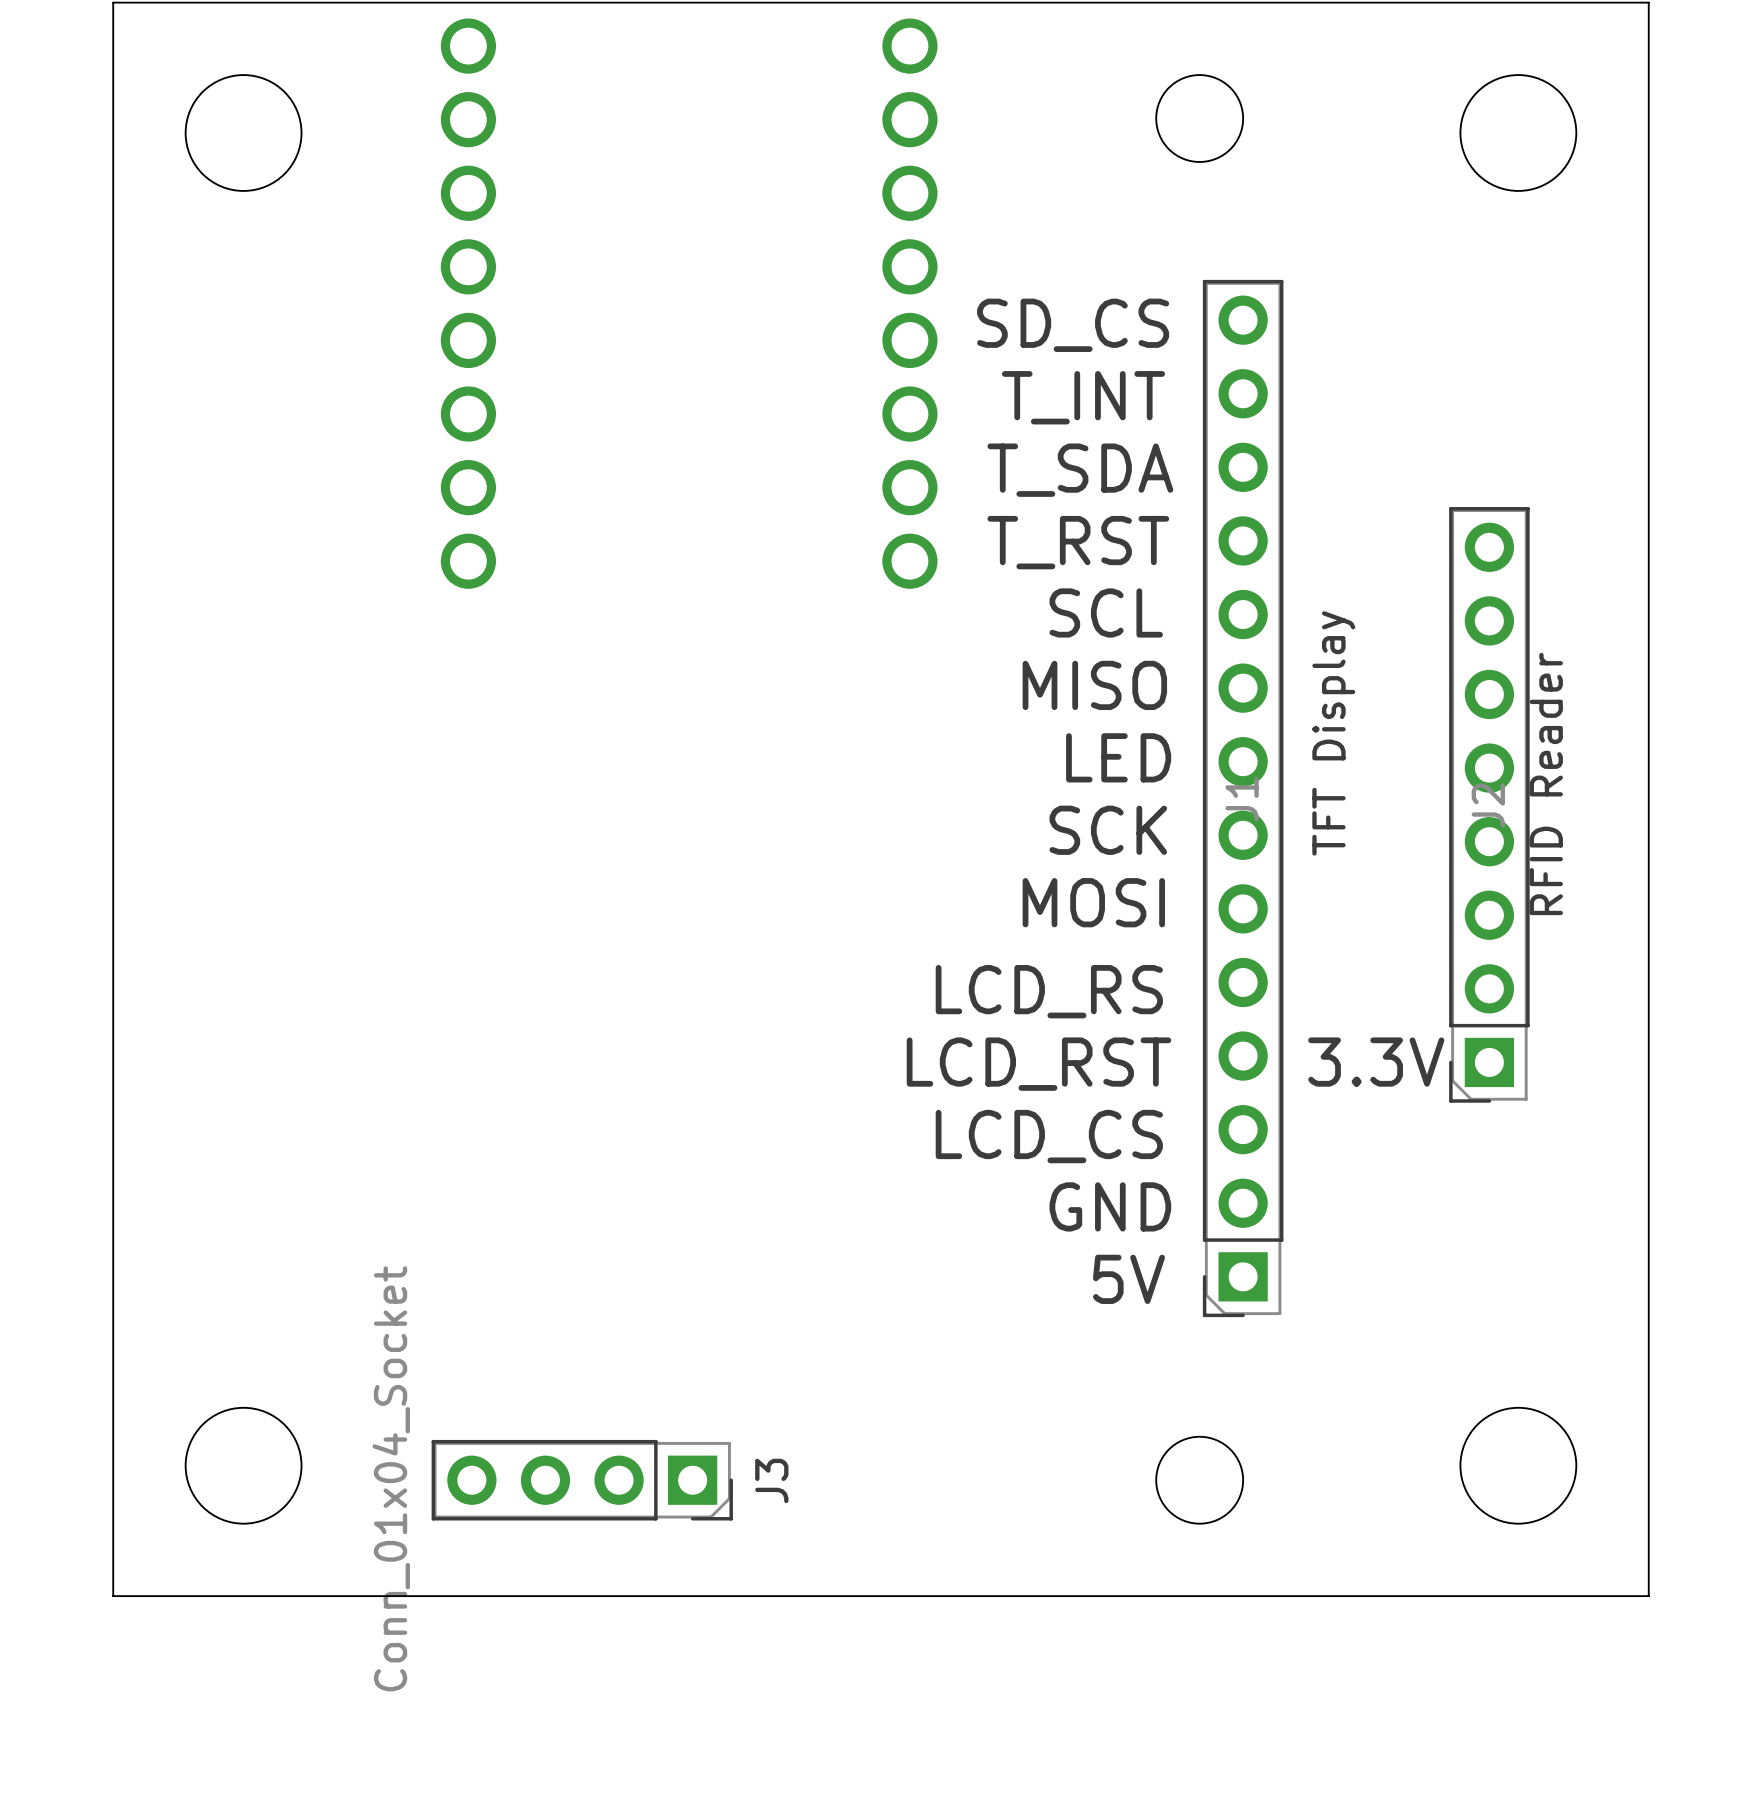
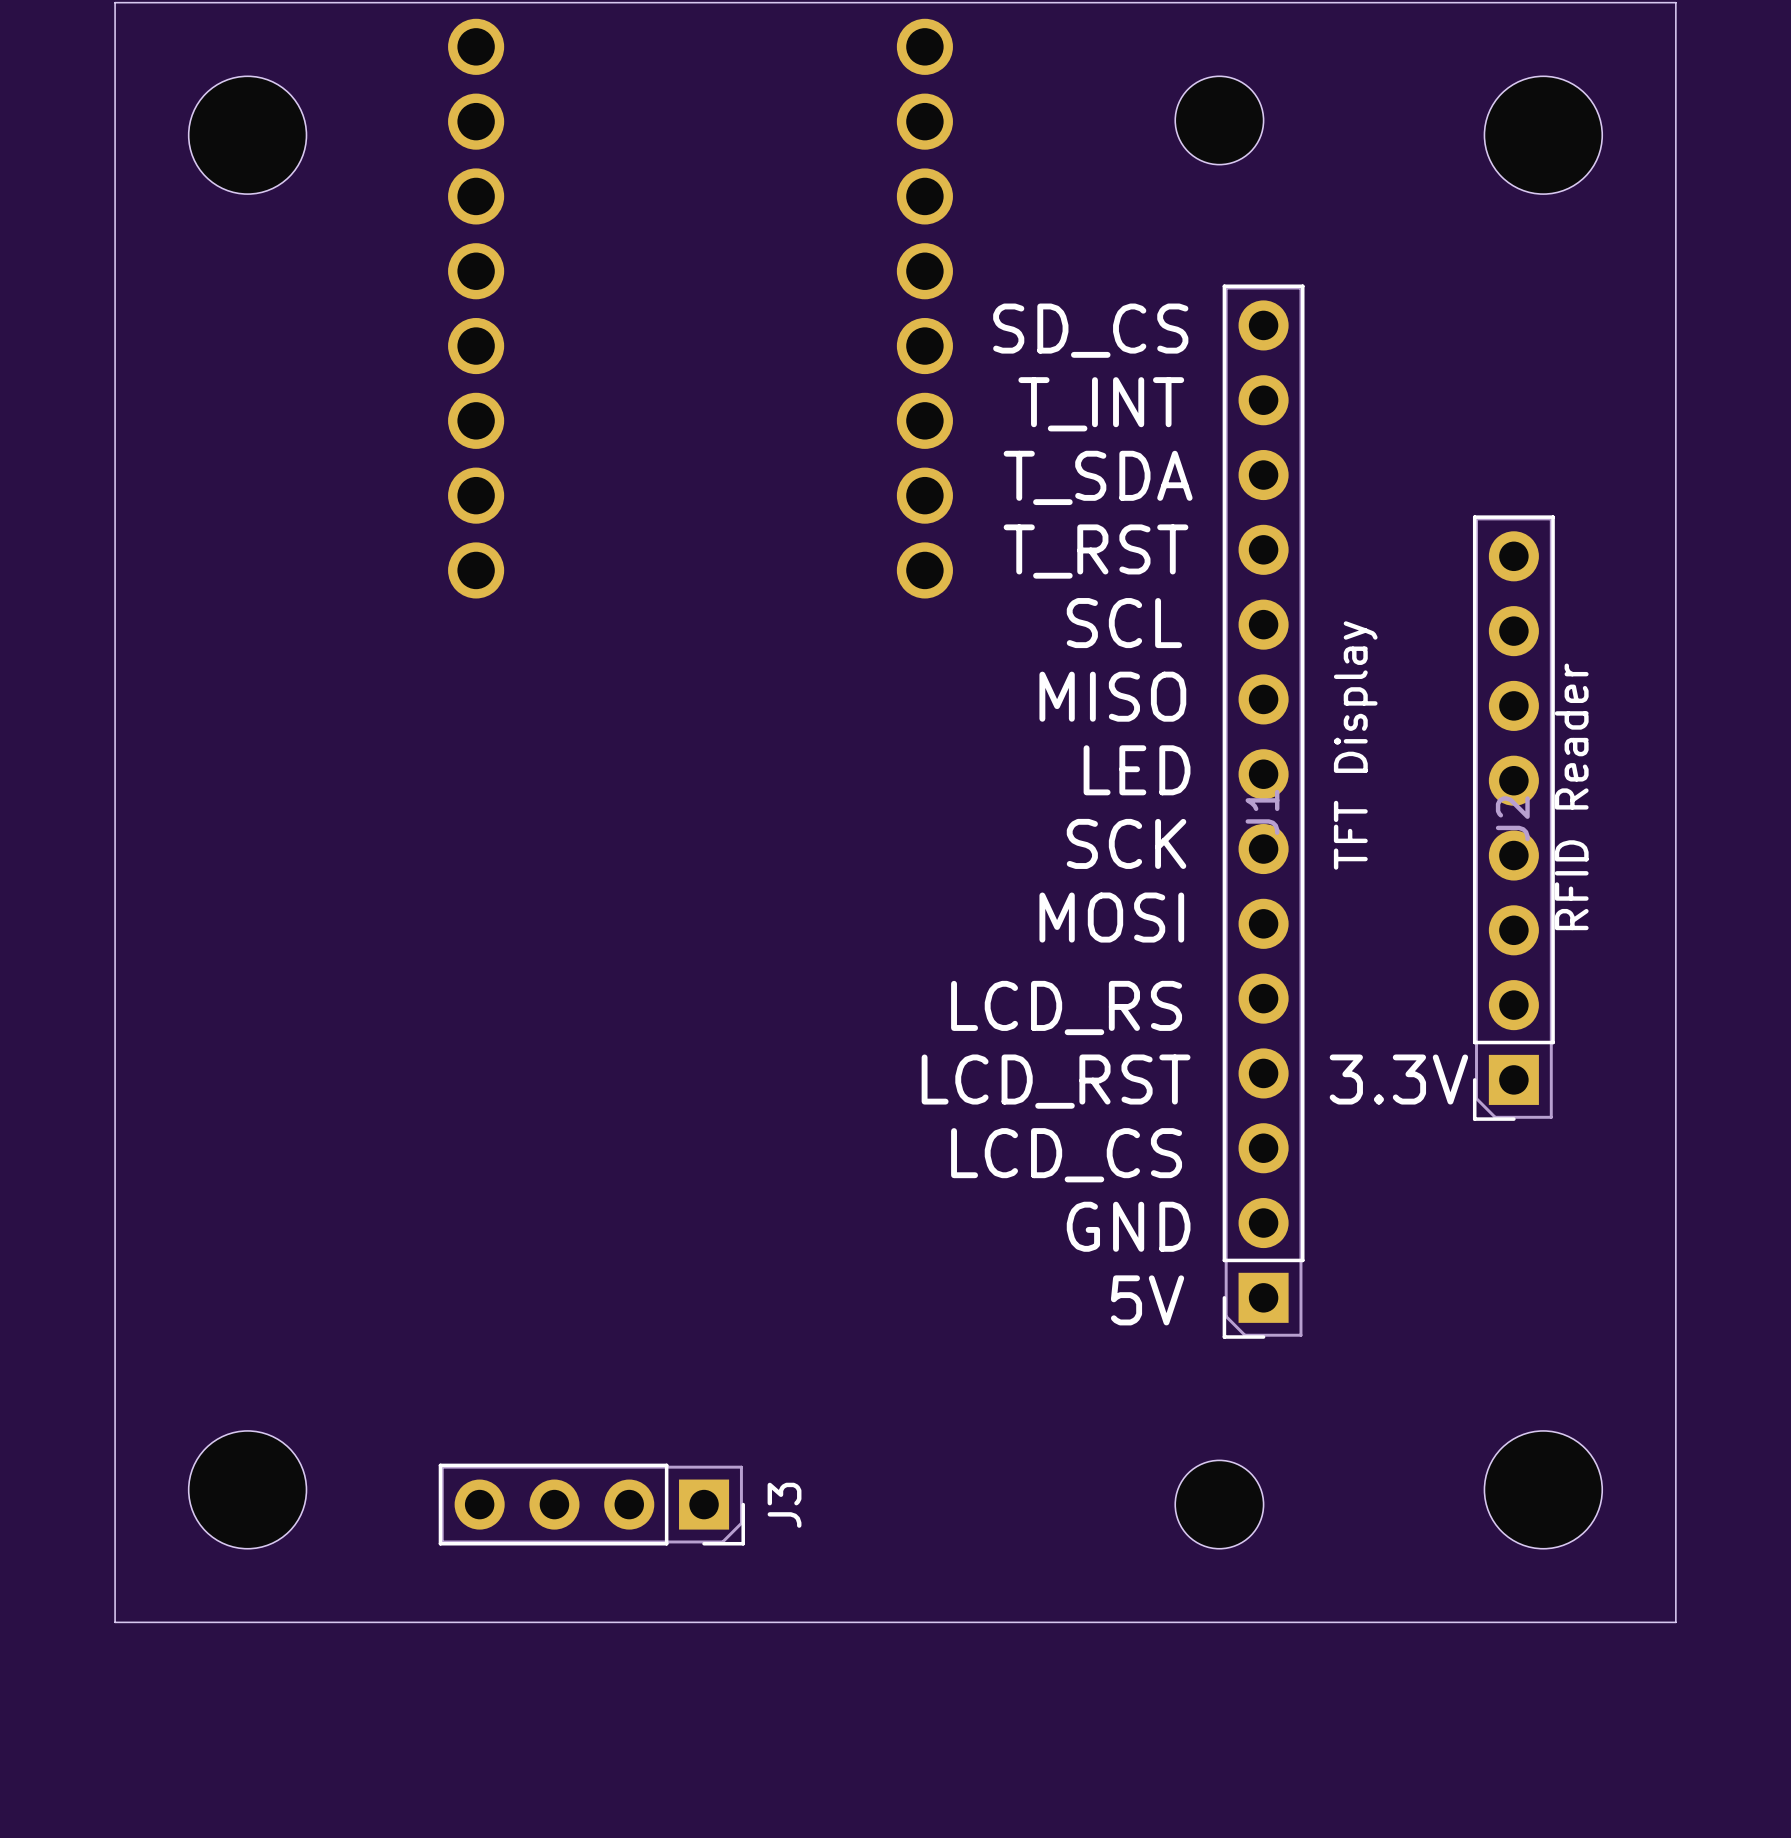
J3 value: Conn_01x04_Socket (391, 1478) -> none

